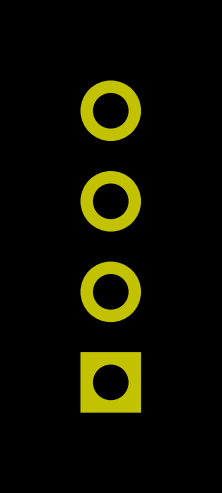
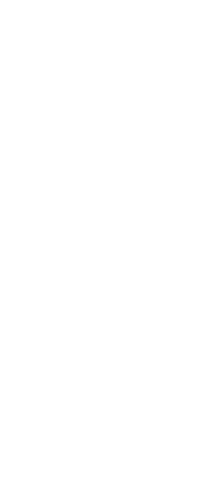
part: (110, 246) -> none

